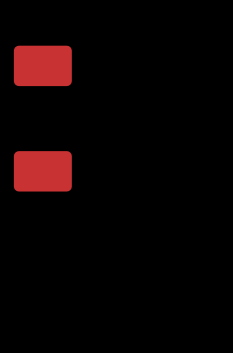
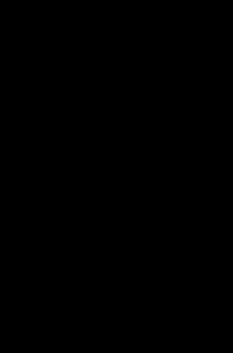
part: (42, 118) -> none

